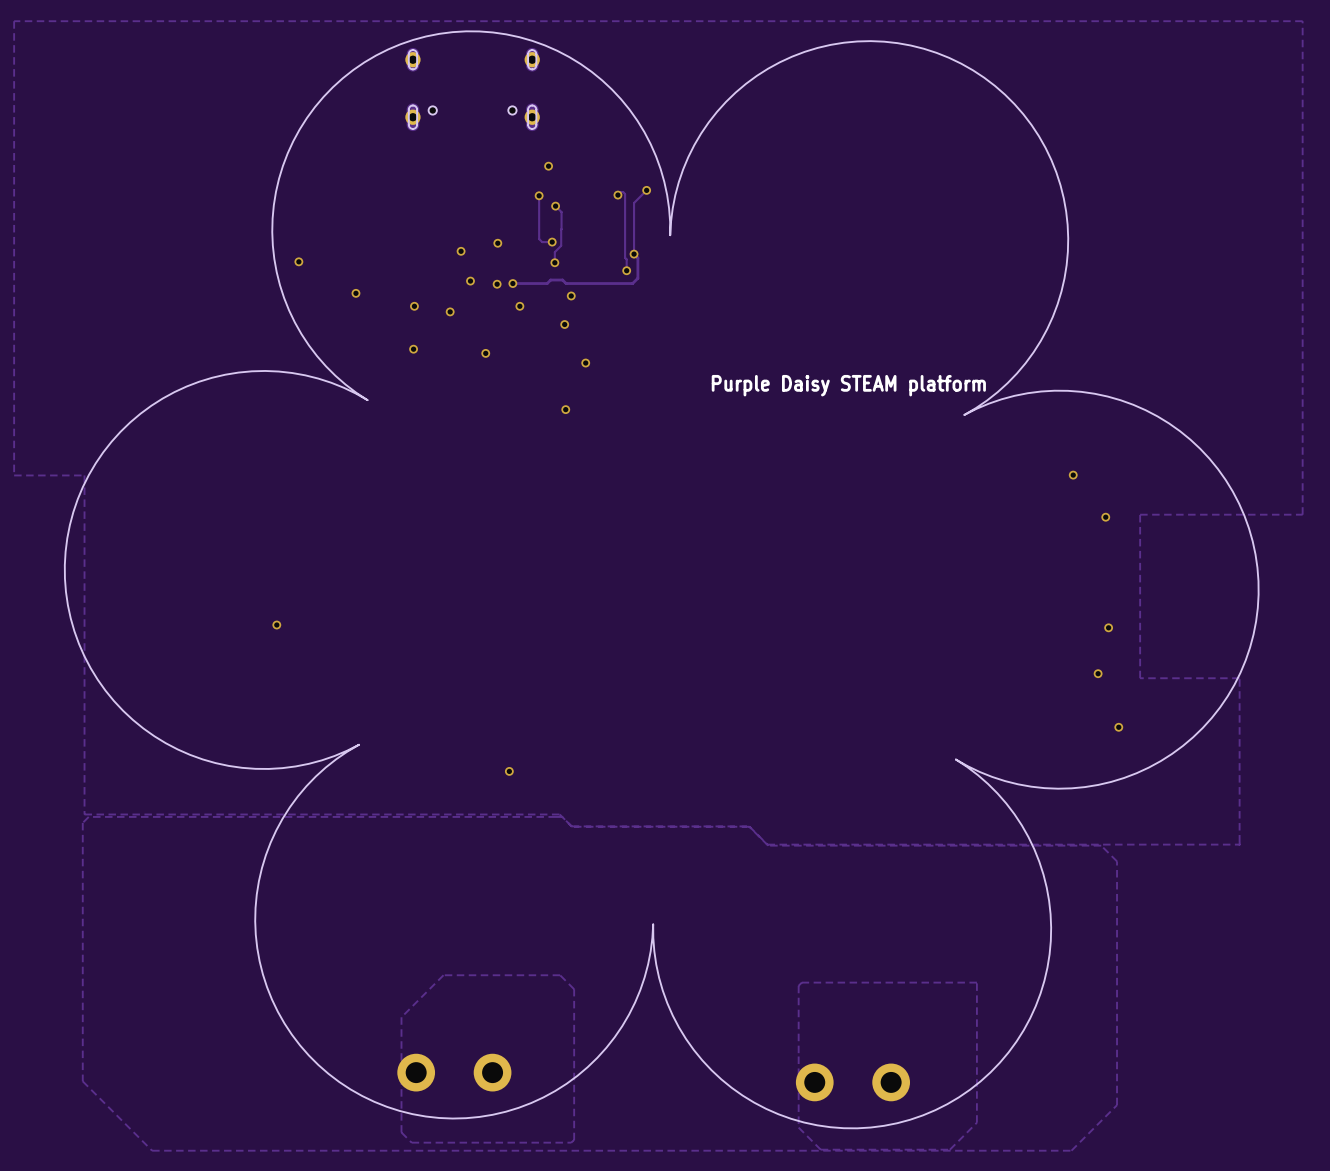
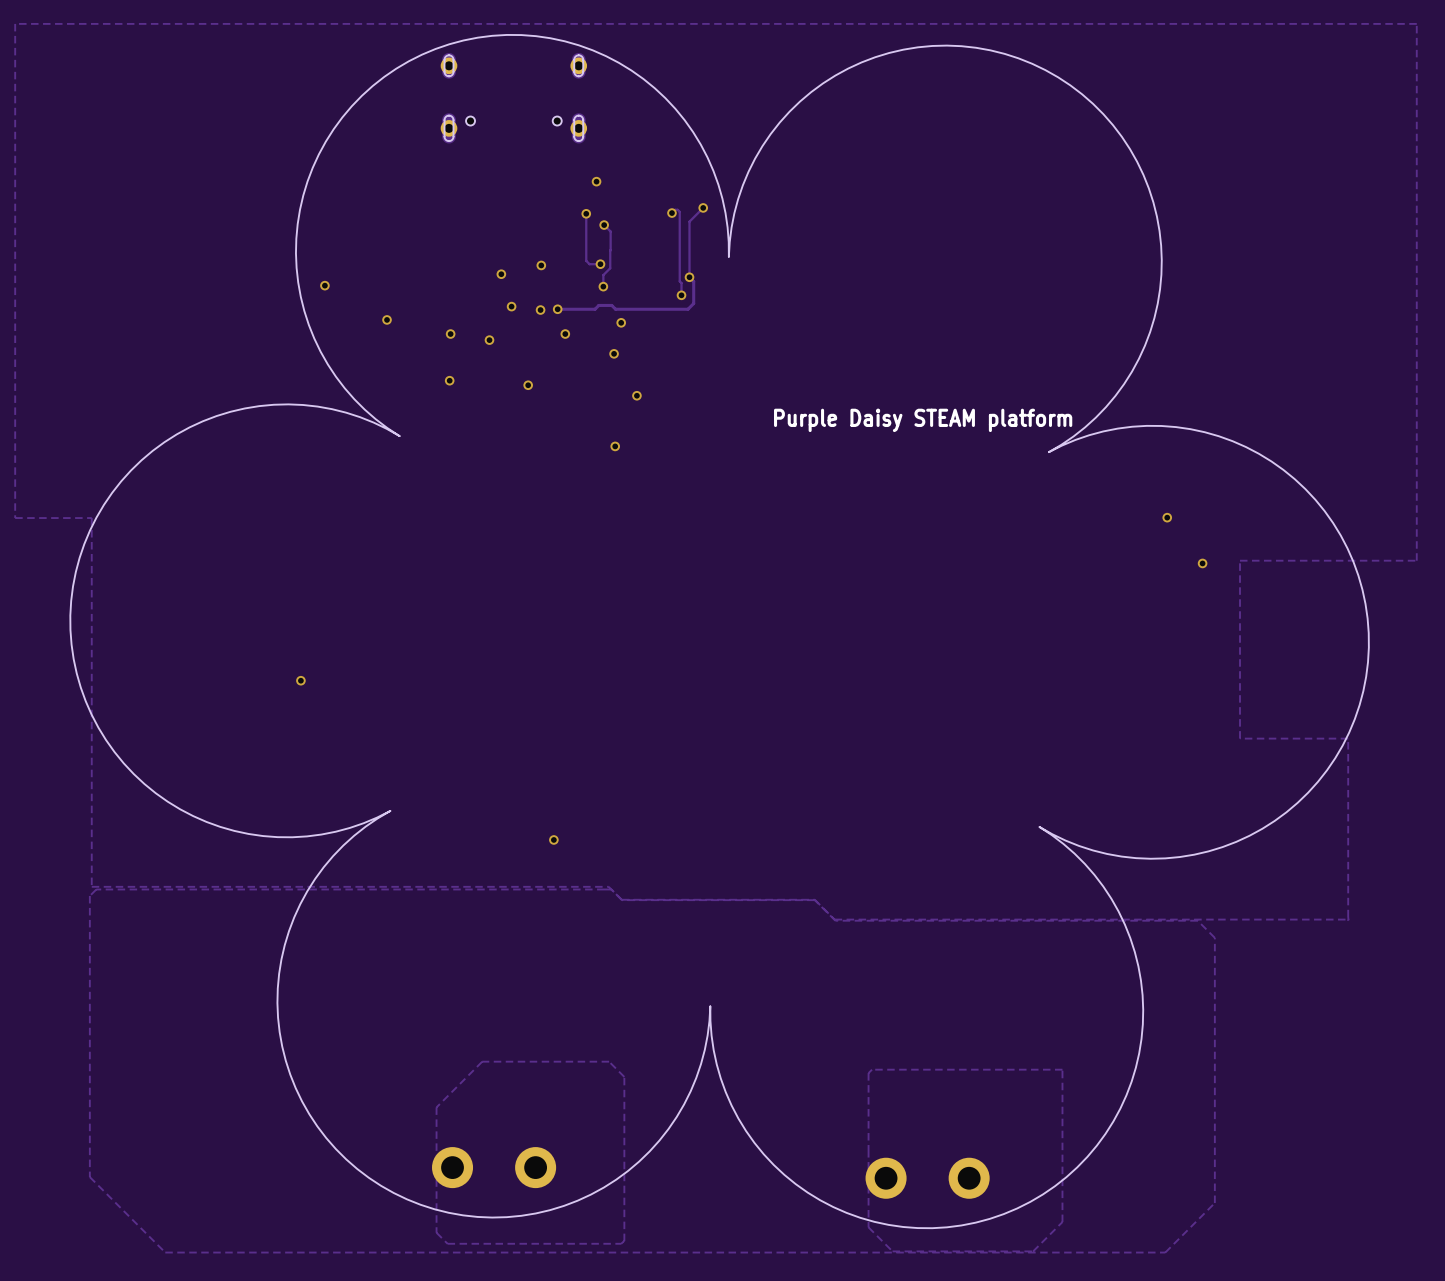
via: (1108, 627) -> none
via: (1098, 673) -> none
via: (1118, 727) -> none

